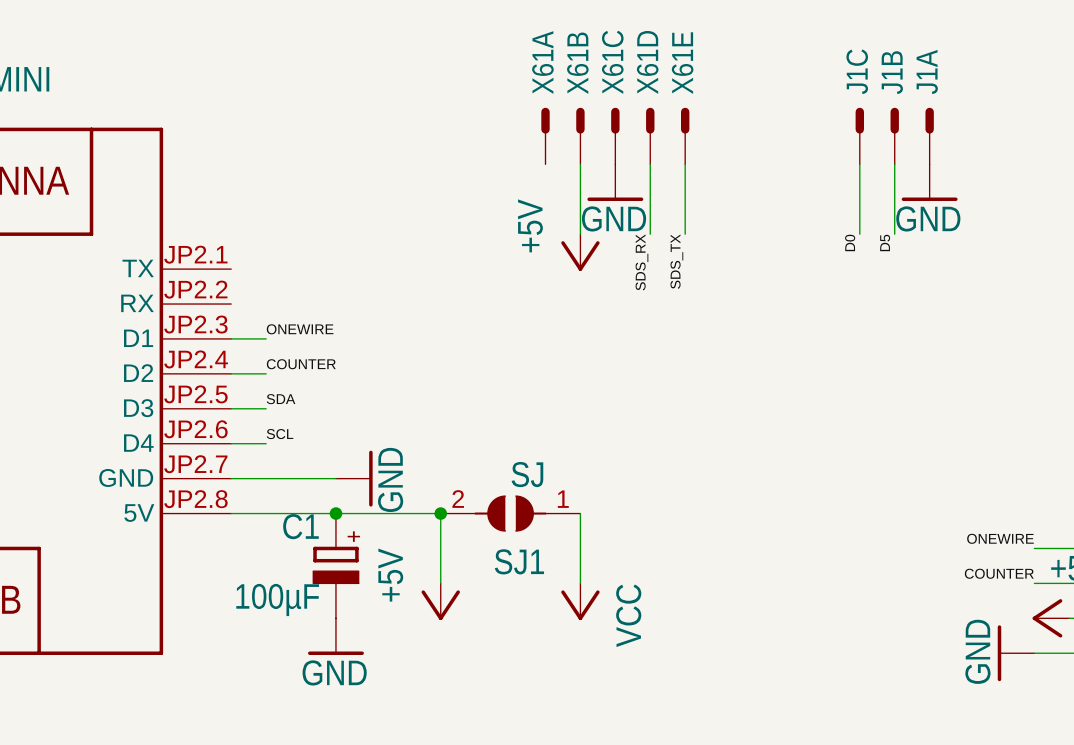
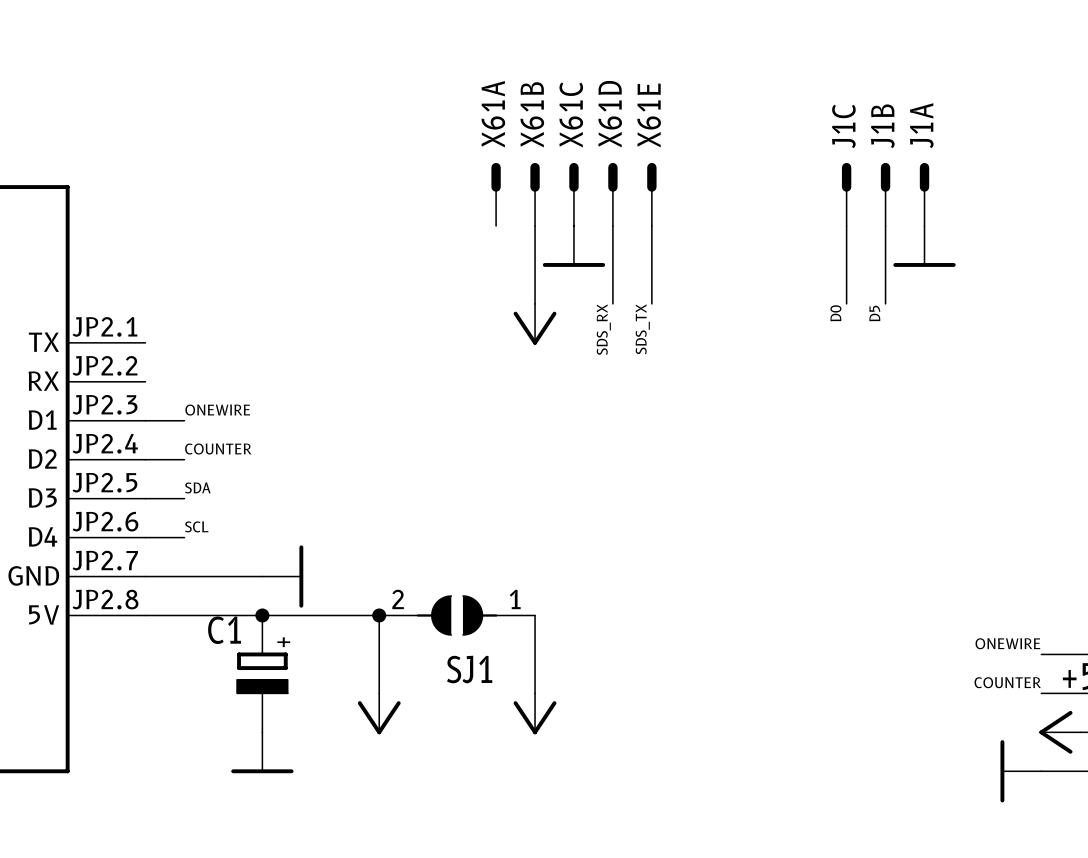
power symbol text: GND (614, 218) -> none
power symbol text: GND (928, 218) -> none
power symbol text: +5V (530, 225) -> none
SJ1 value: SJ (527, 474) -> none
power symbol text: GND (390, 479) -> none
power symbol text: +5V (390, 575) -> none
C1 value: 100µF (277, 599) -> none
power symbol text: VCC (628, 615) -> none
power symbol text: GND (977, 651) -> none
power symbol text: GND (334, 672) -> none

